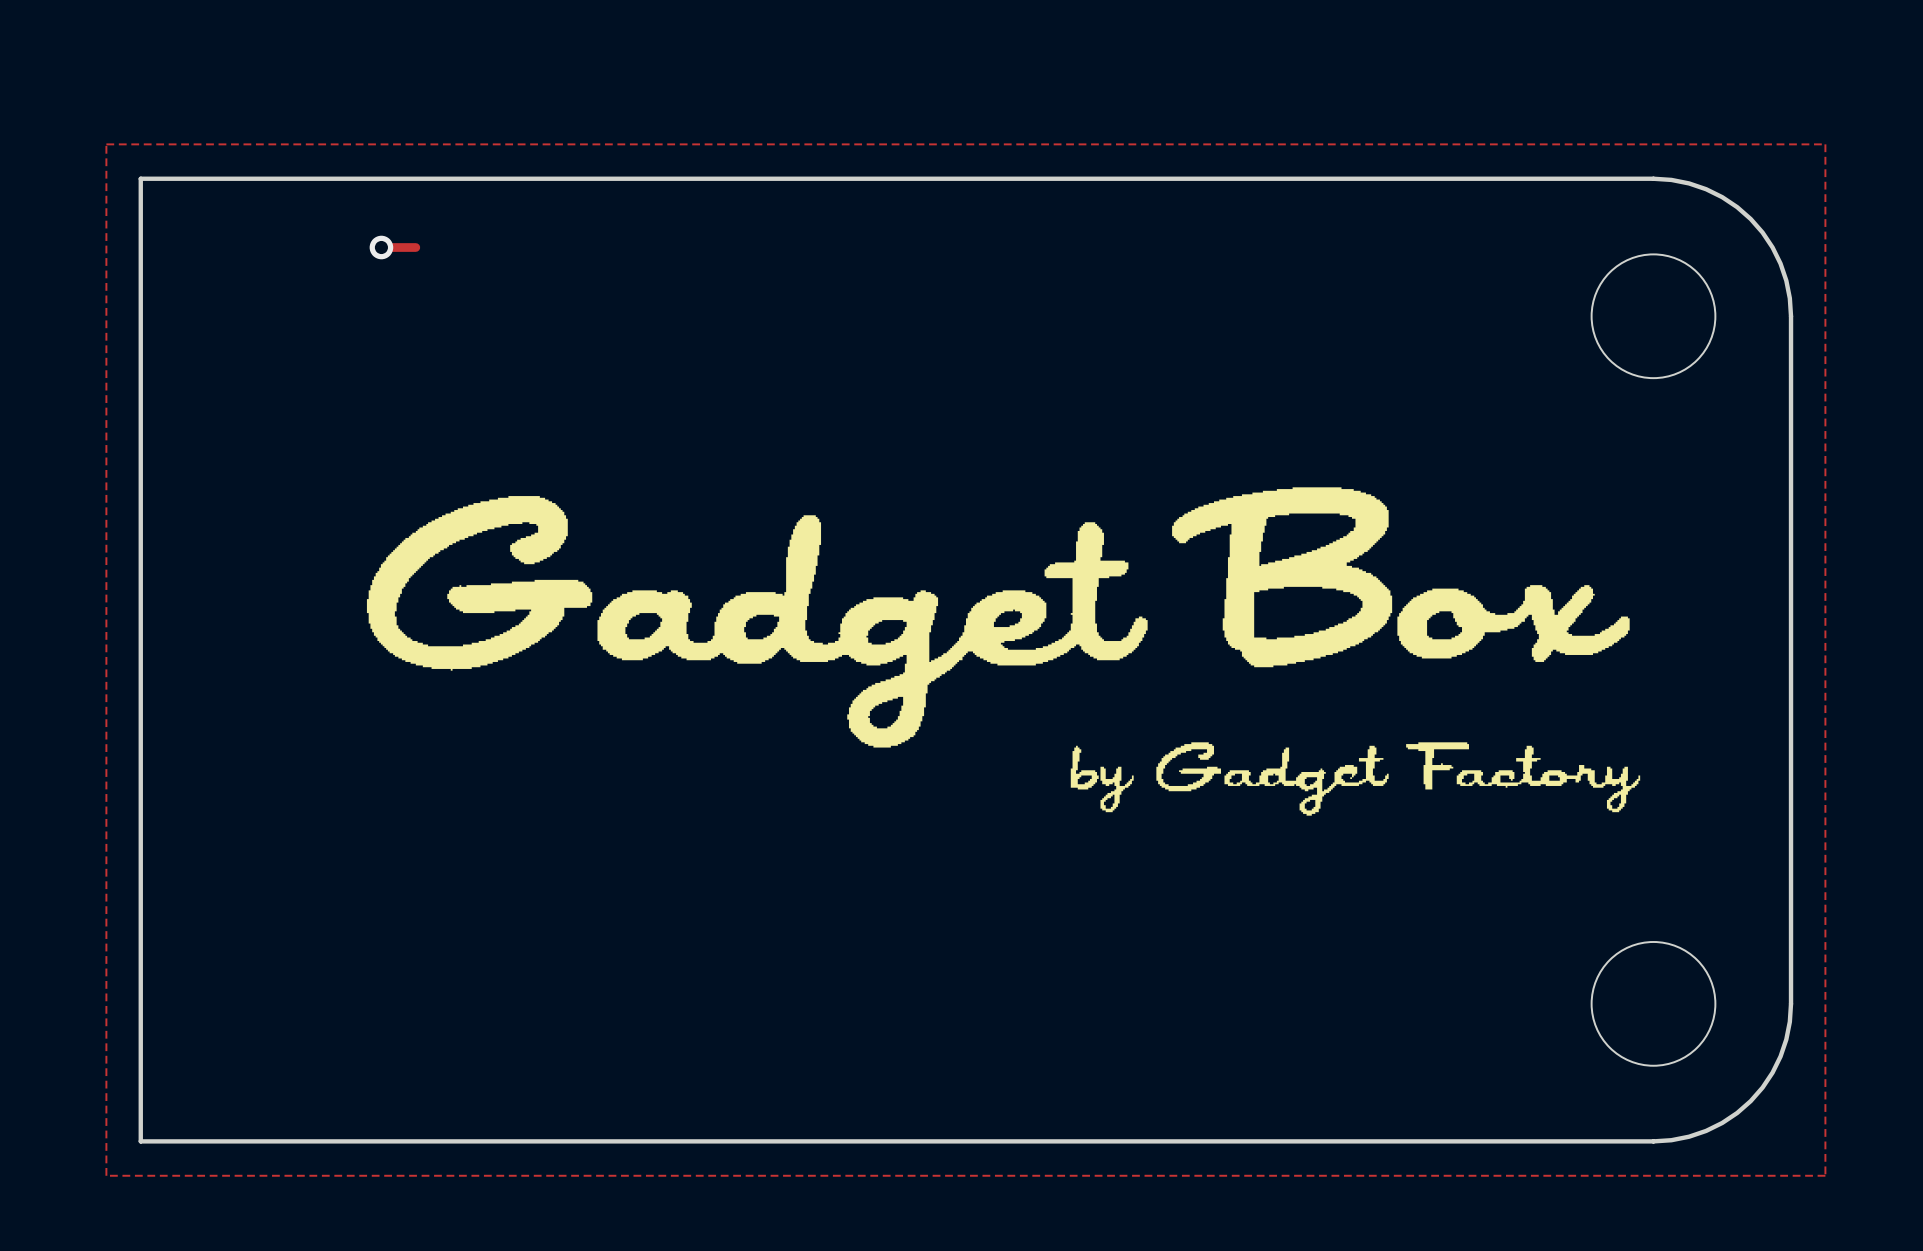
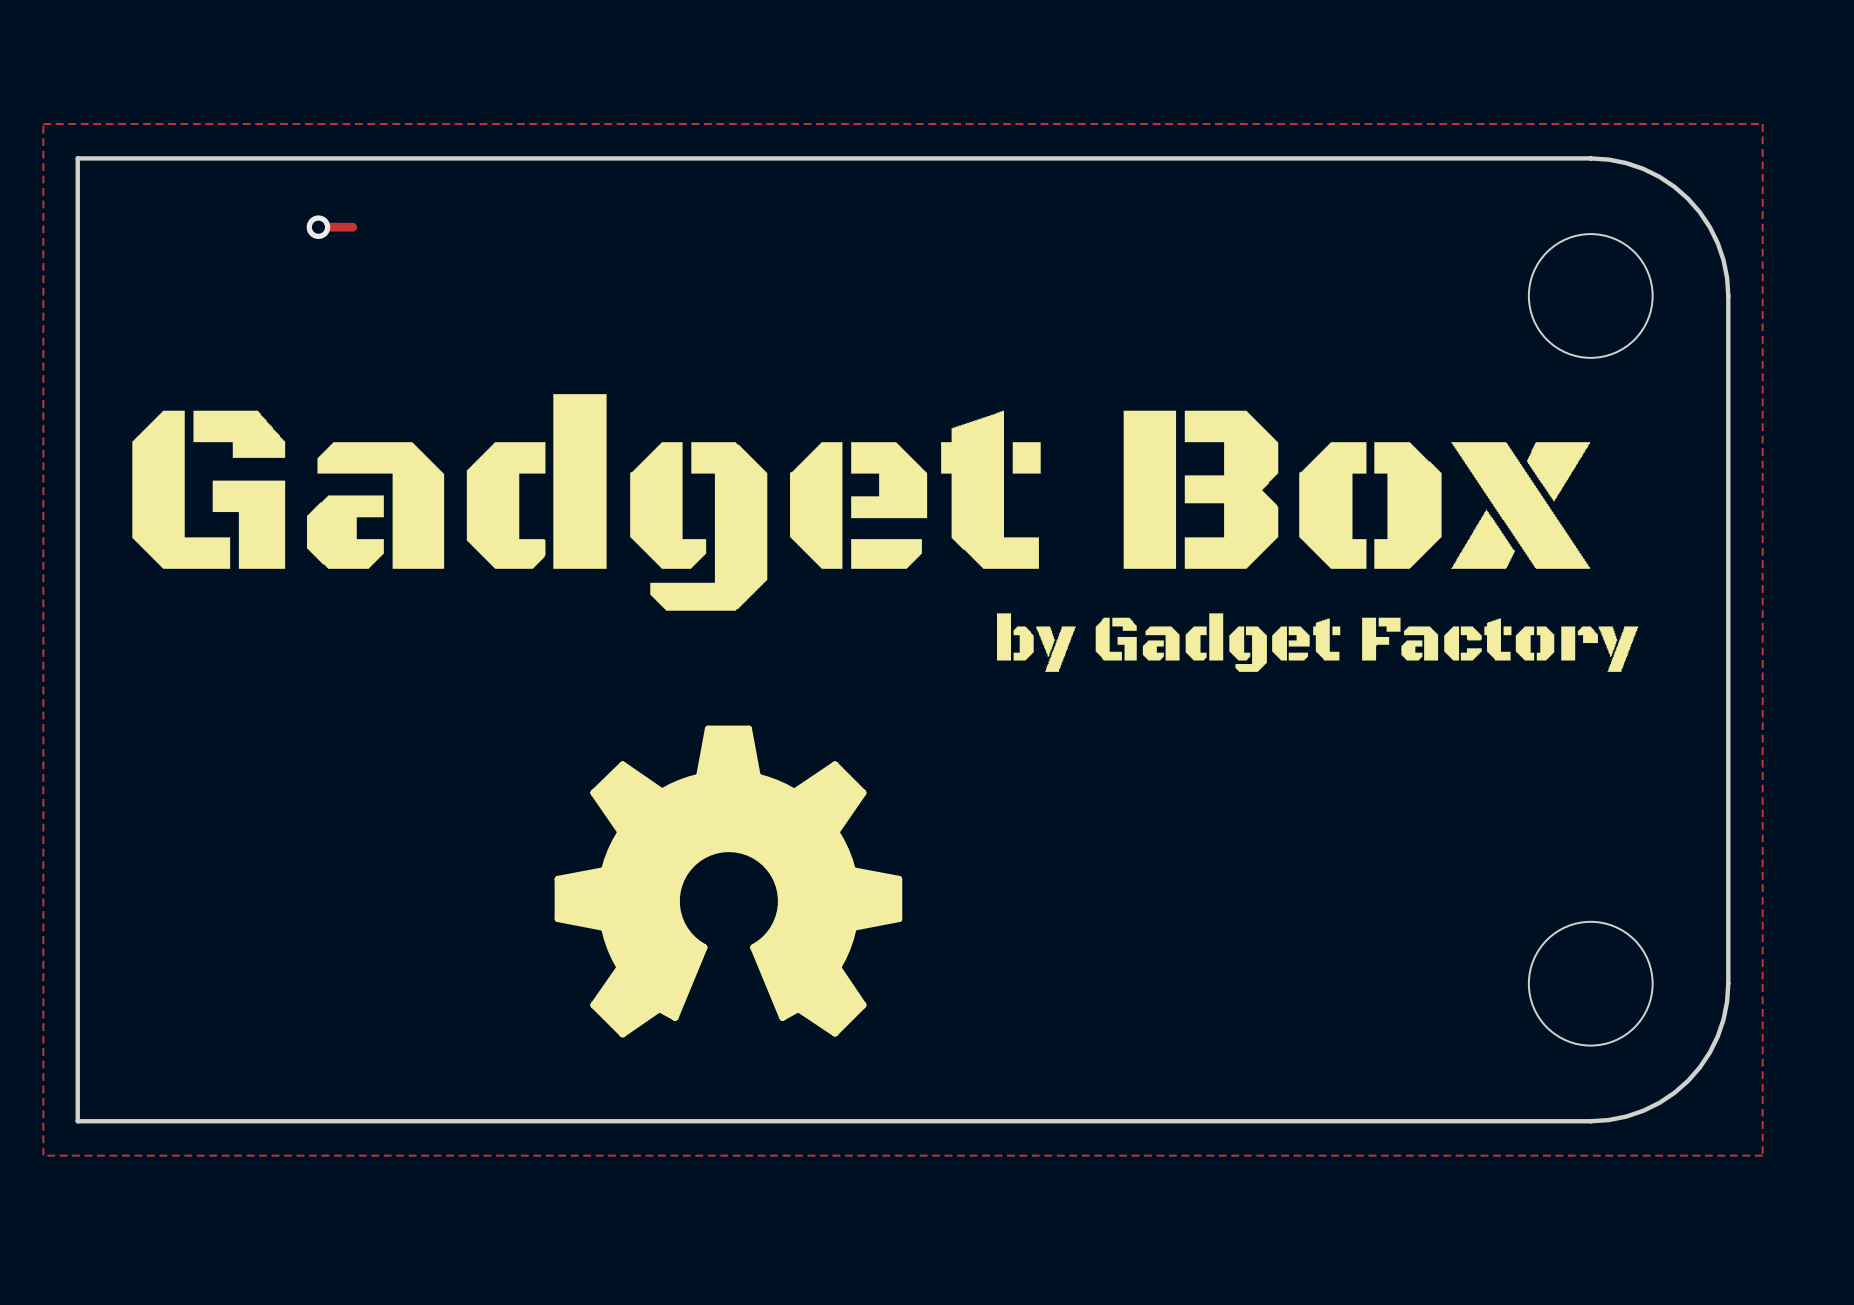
drawing: none -> [132, 394, 1639, 672]
drawing: [366, 487, 1641, 816] -> none
drawing: none -> [554, 725, 903, 1038]

